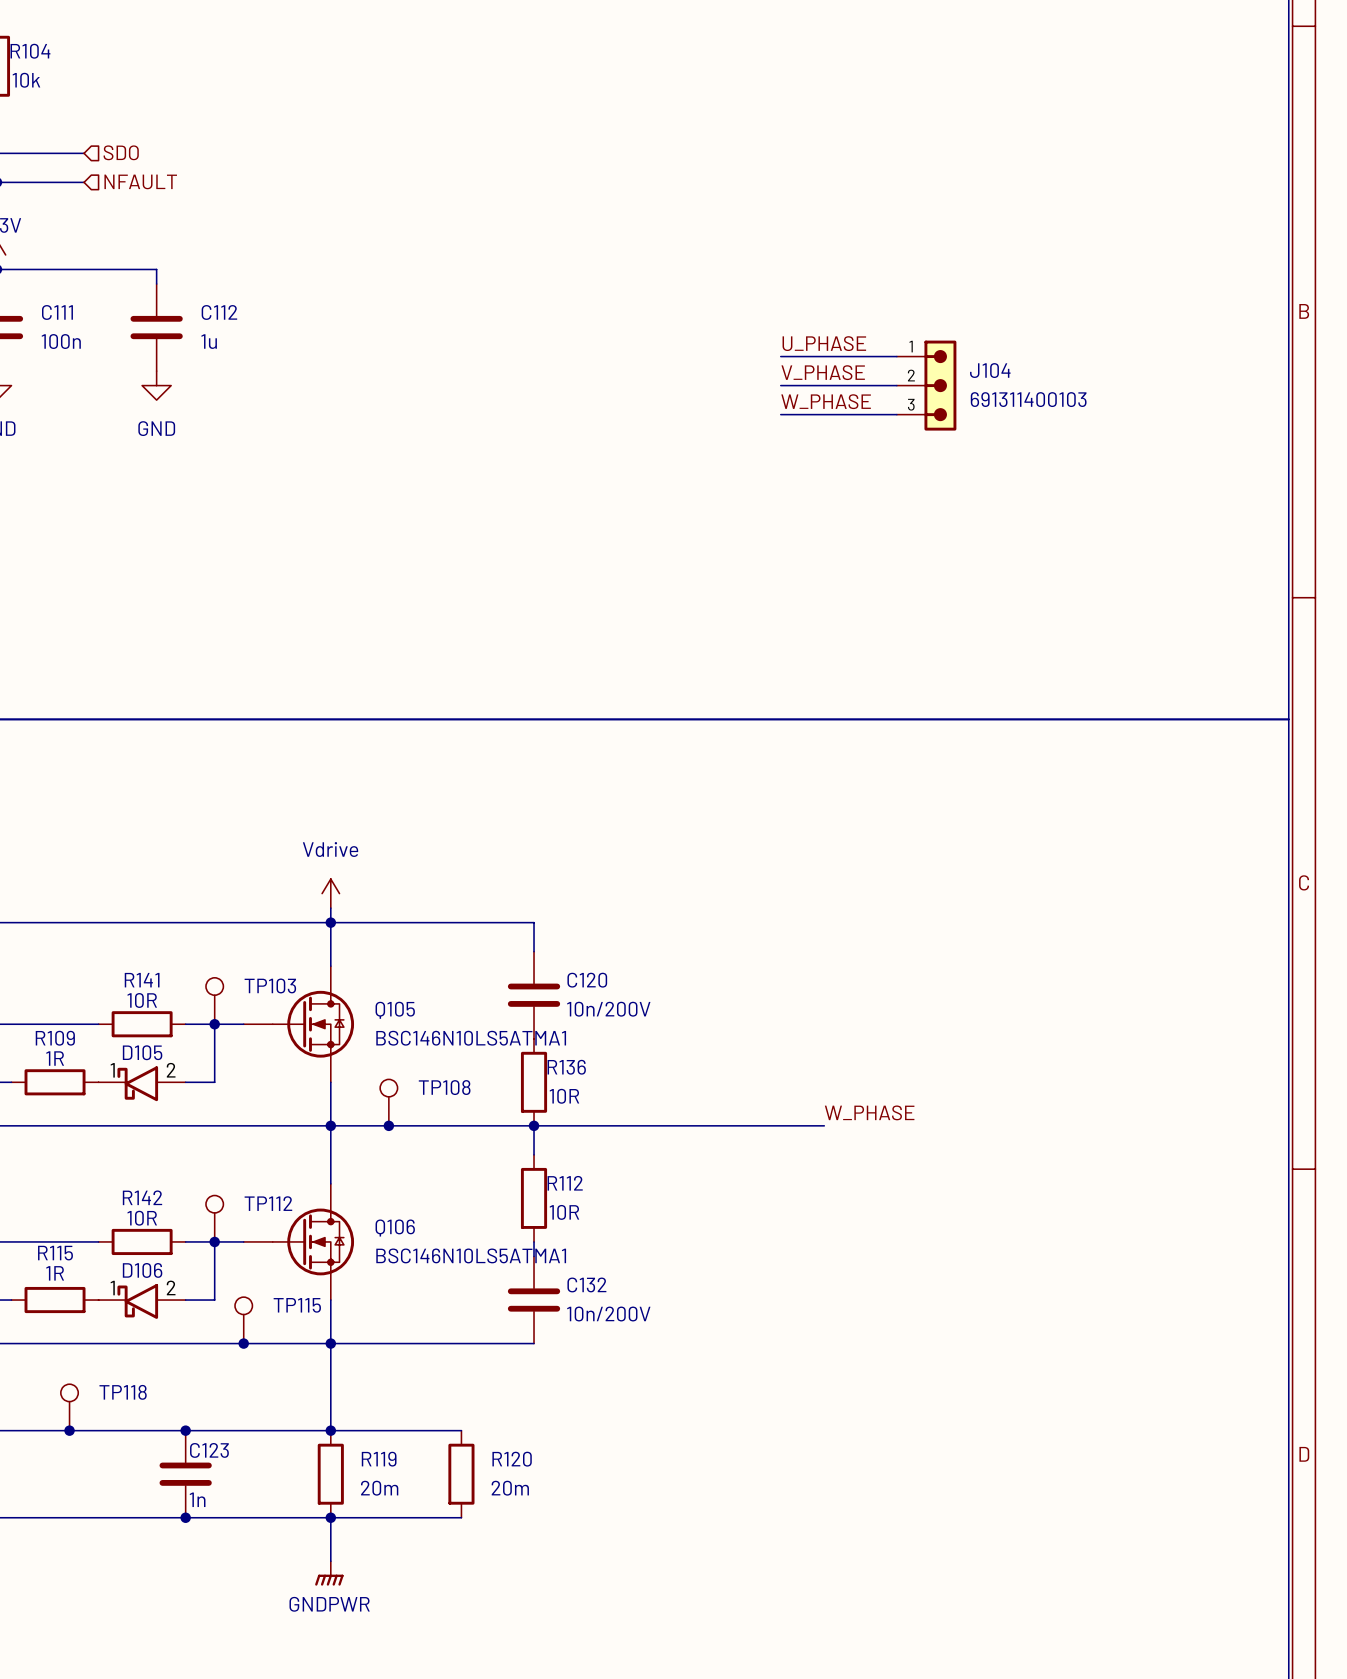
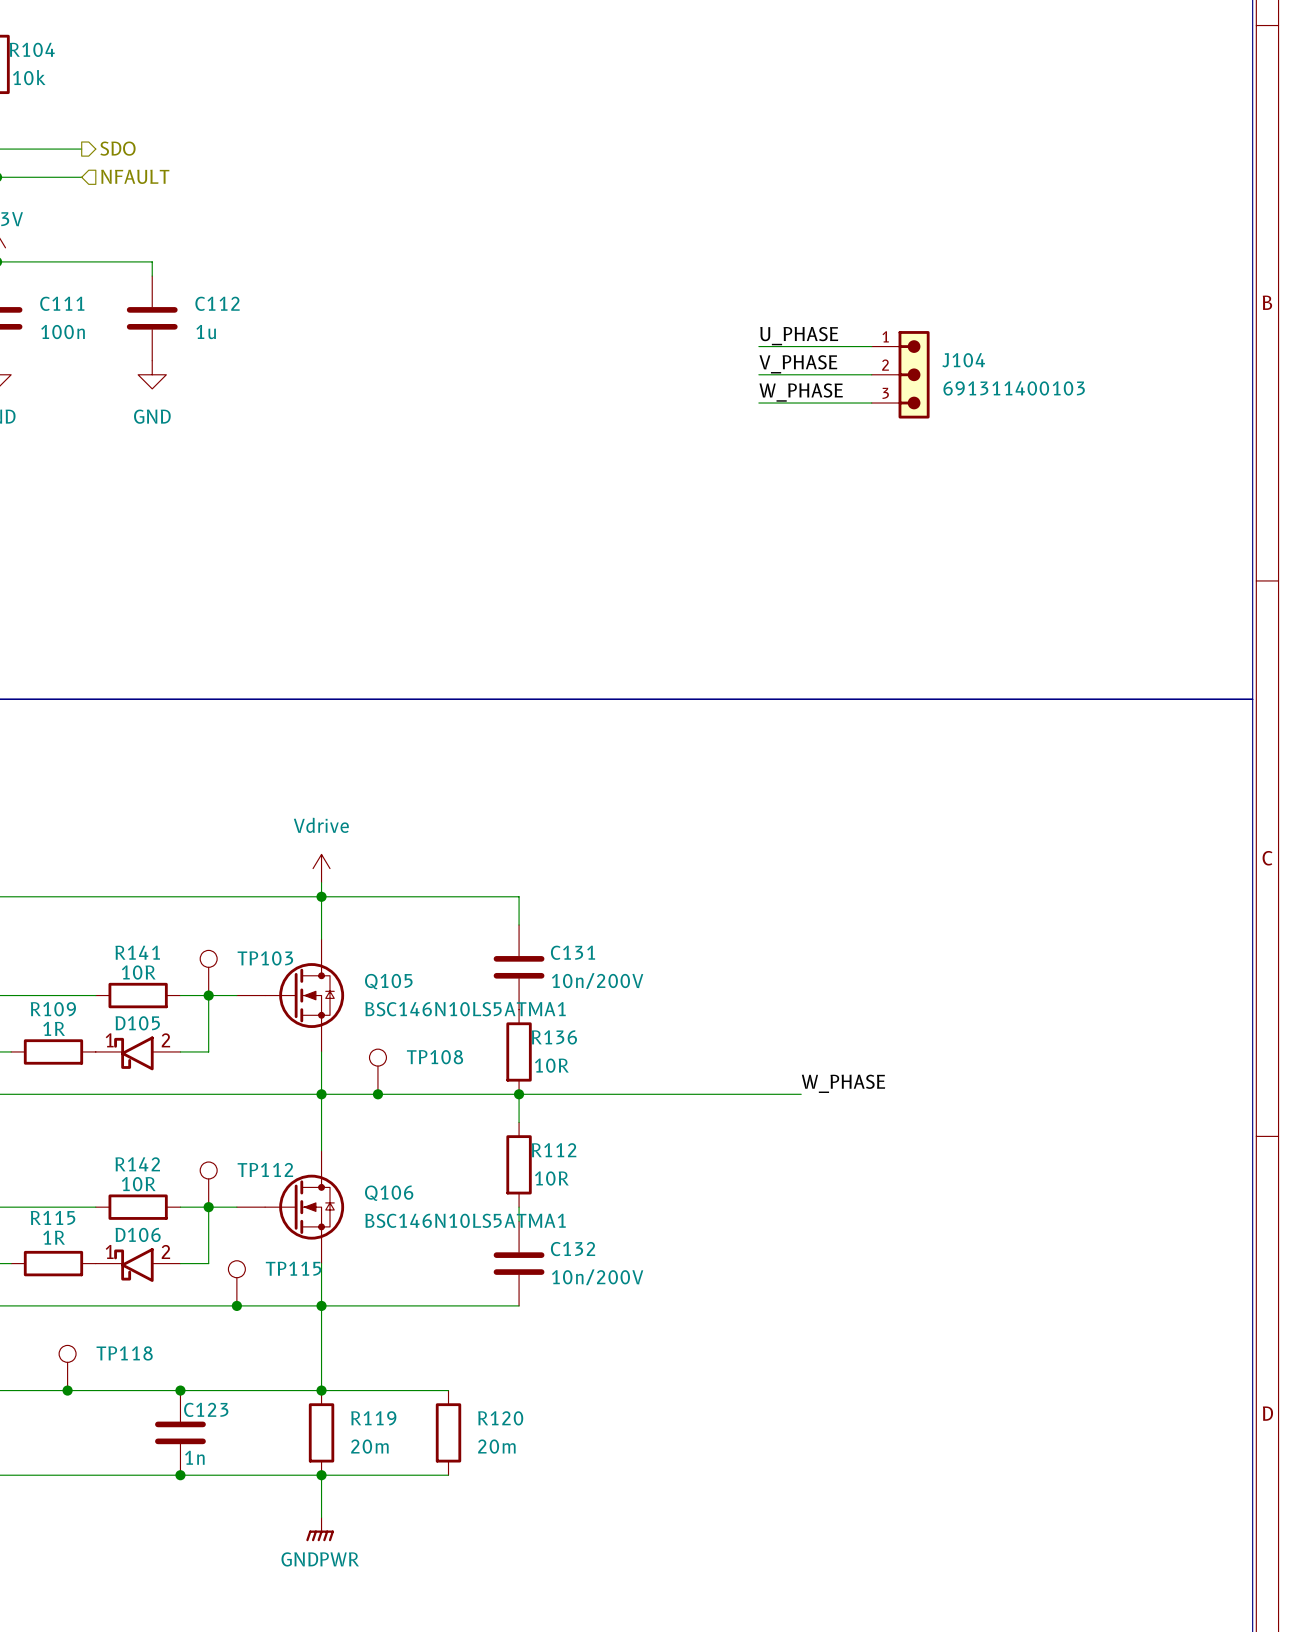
hierarchical label shape: input (121, 152) -> output (117, 148)
C120 name: C120 (587, 980) -> C131 (573, 952)

